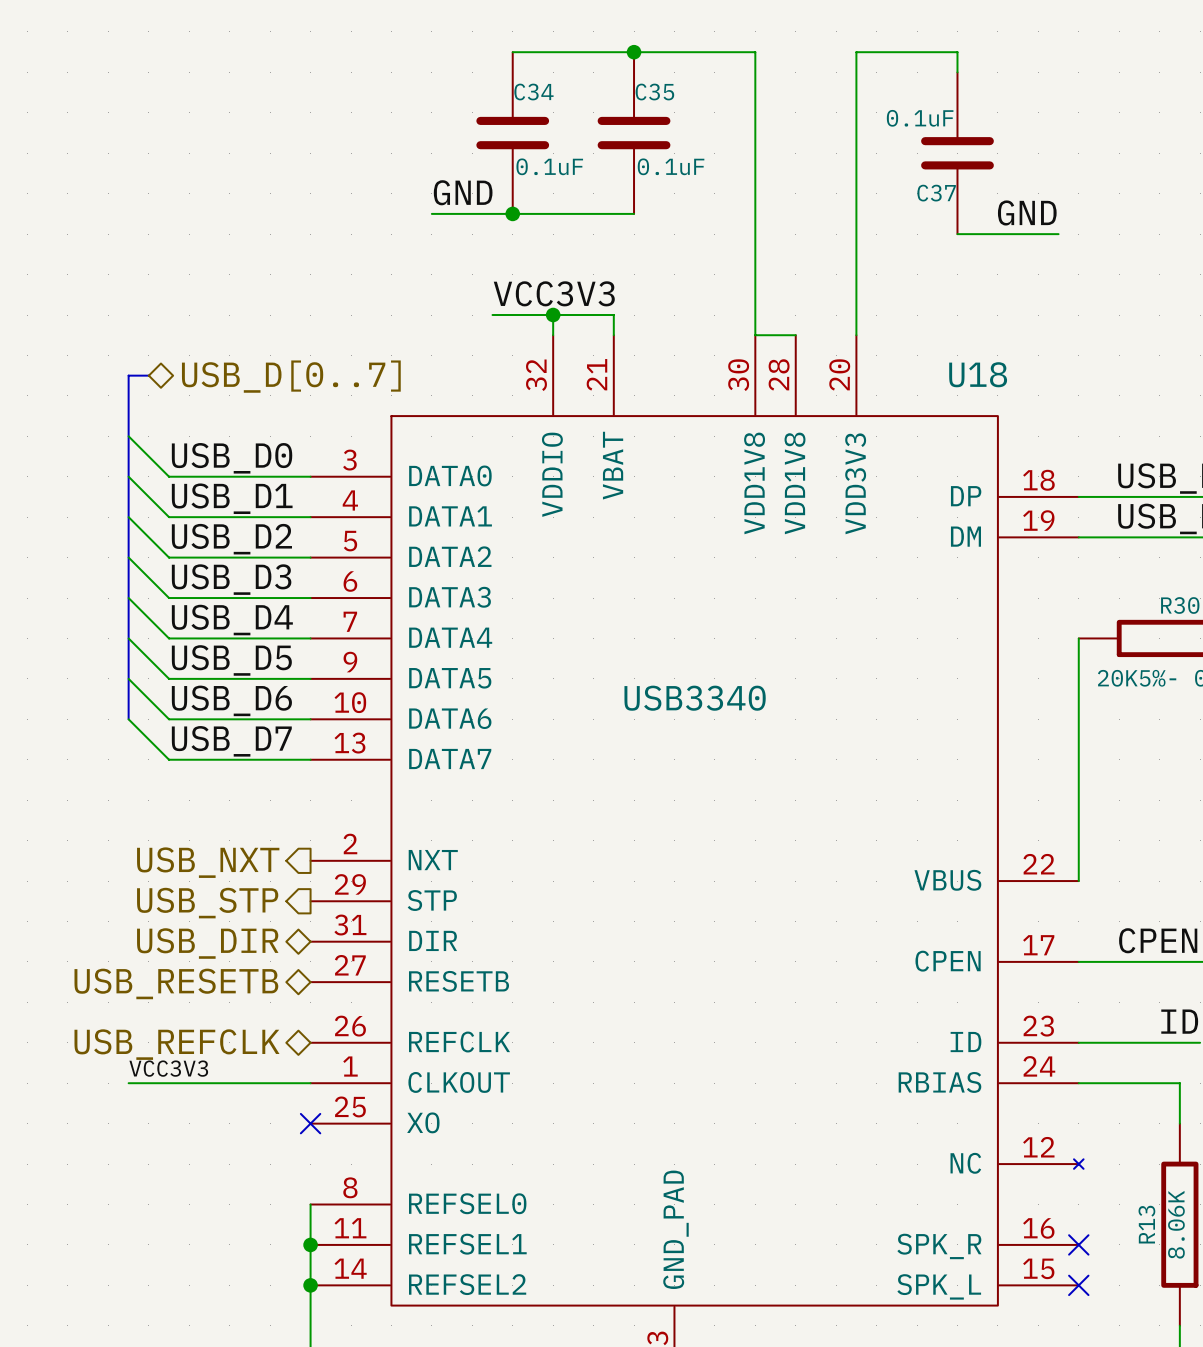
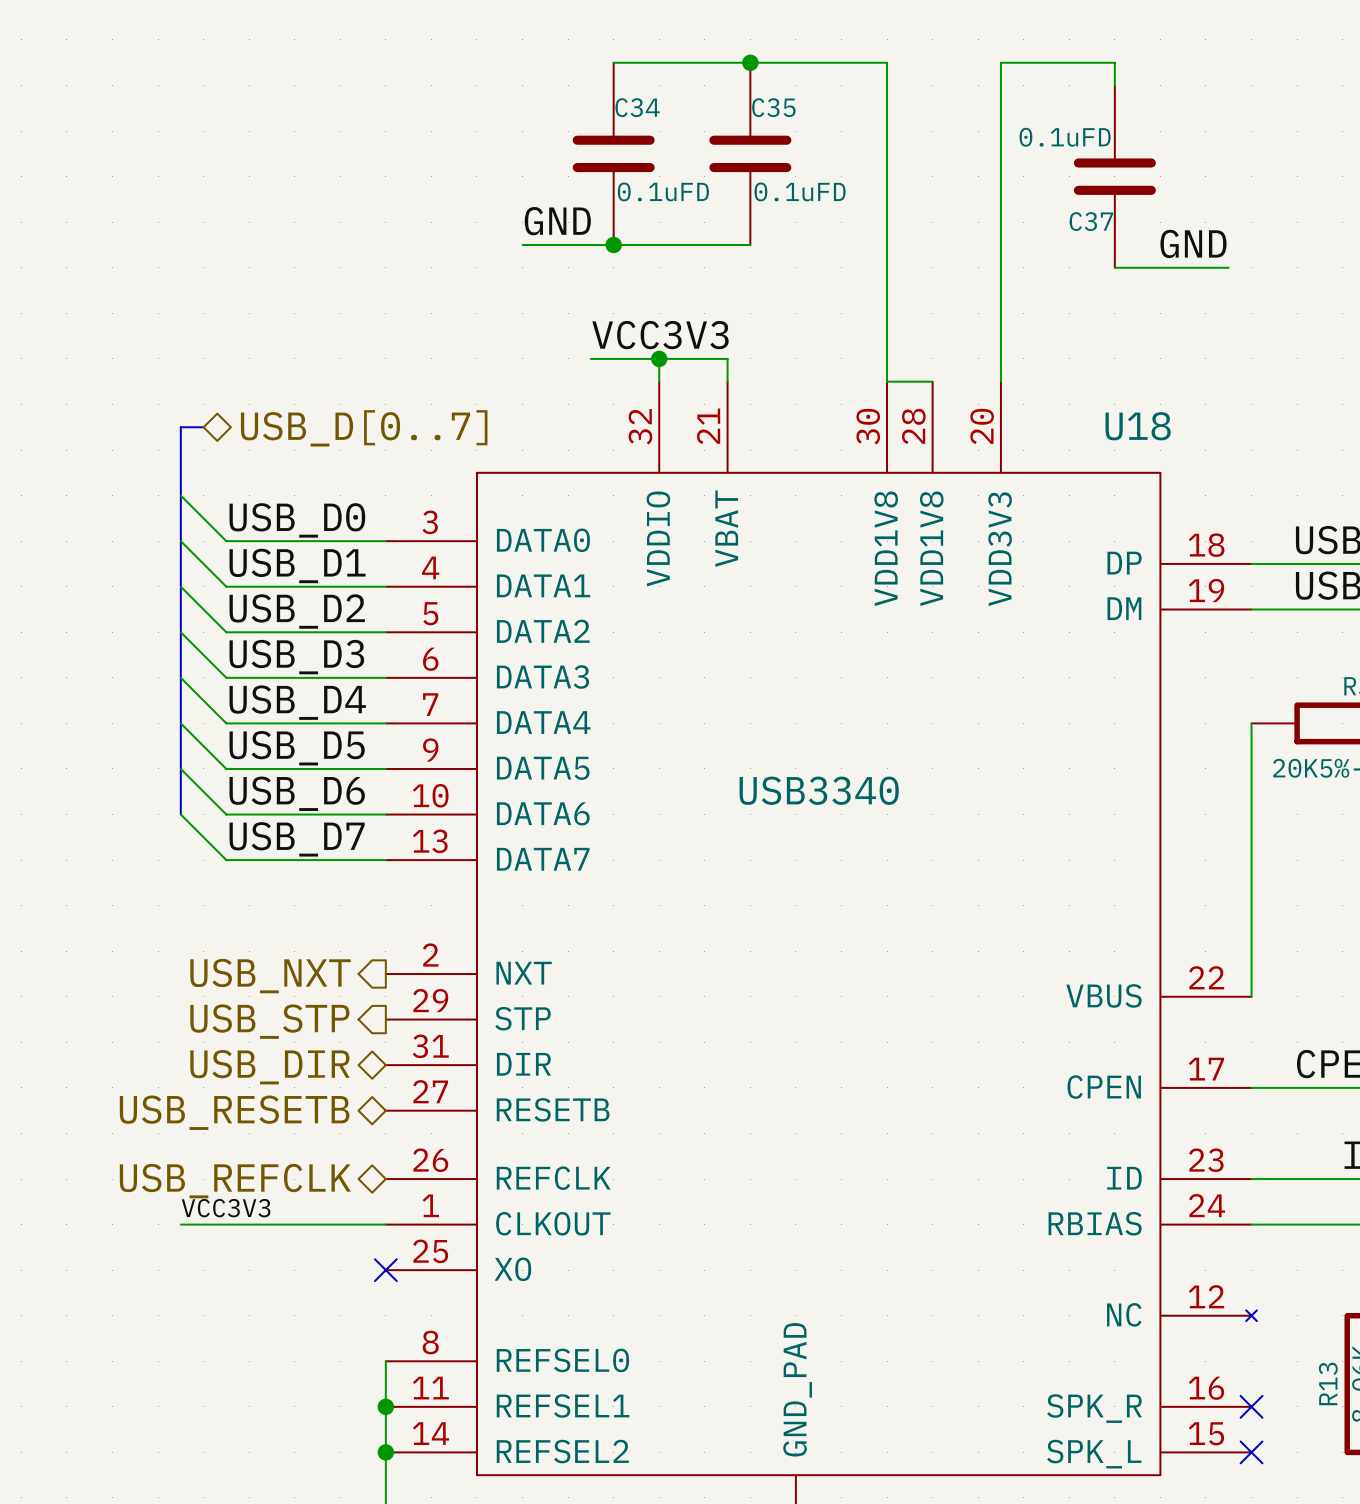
C37 value: 0.1uF (920, 118) -> 0.1uFD (1065, 137)
C34 value: 0.1uF (549, 166) -> 0.1uFD (663, 191)
C35 value: 0.1uF (671, 166) -> 0.1uFD (800, 191)

